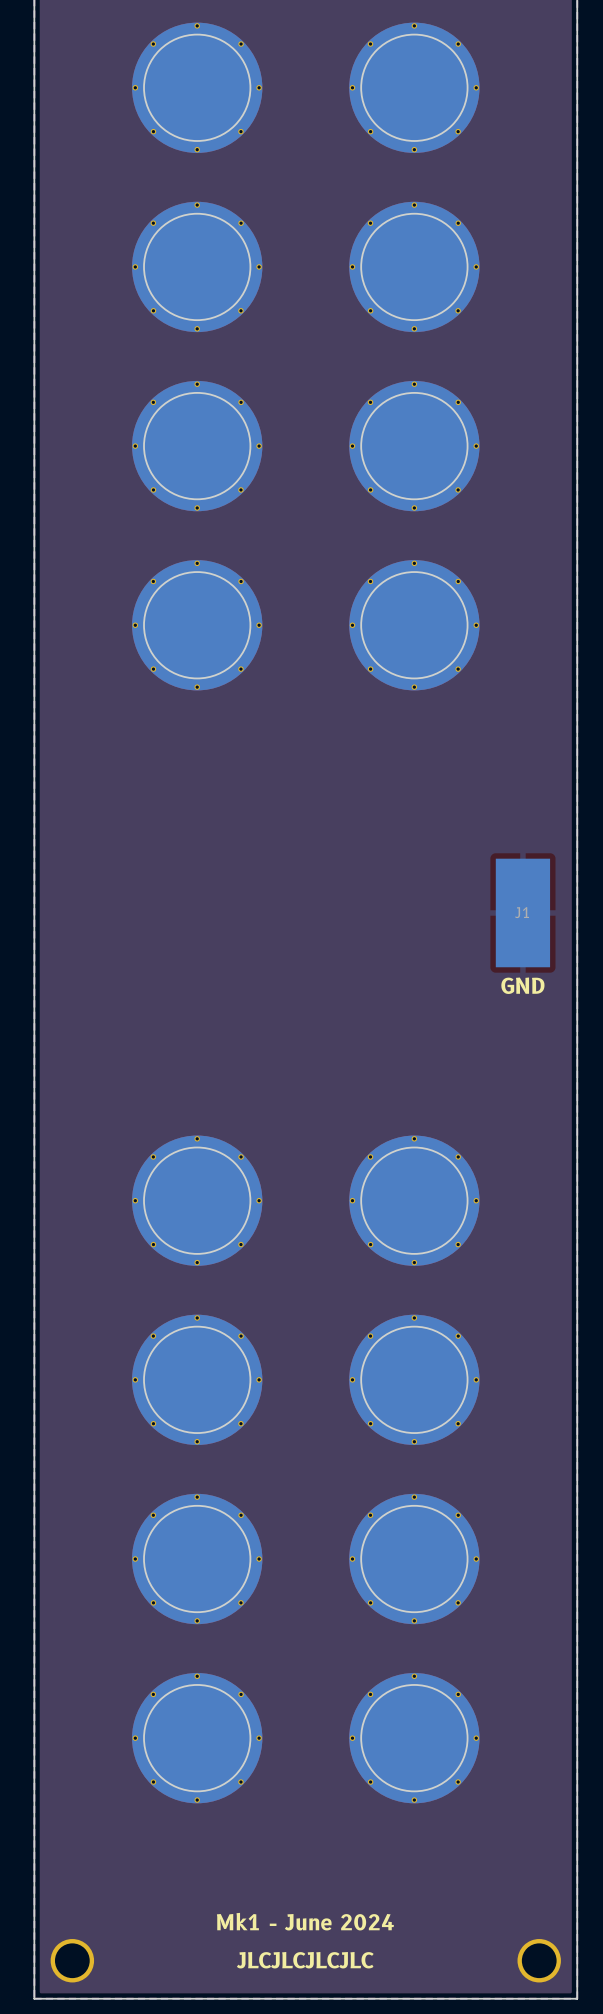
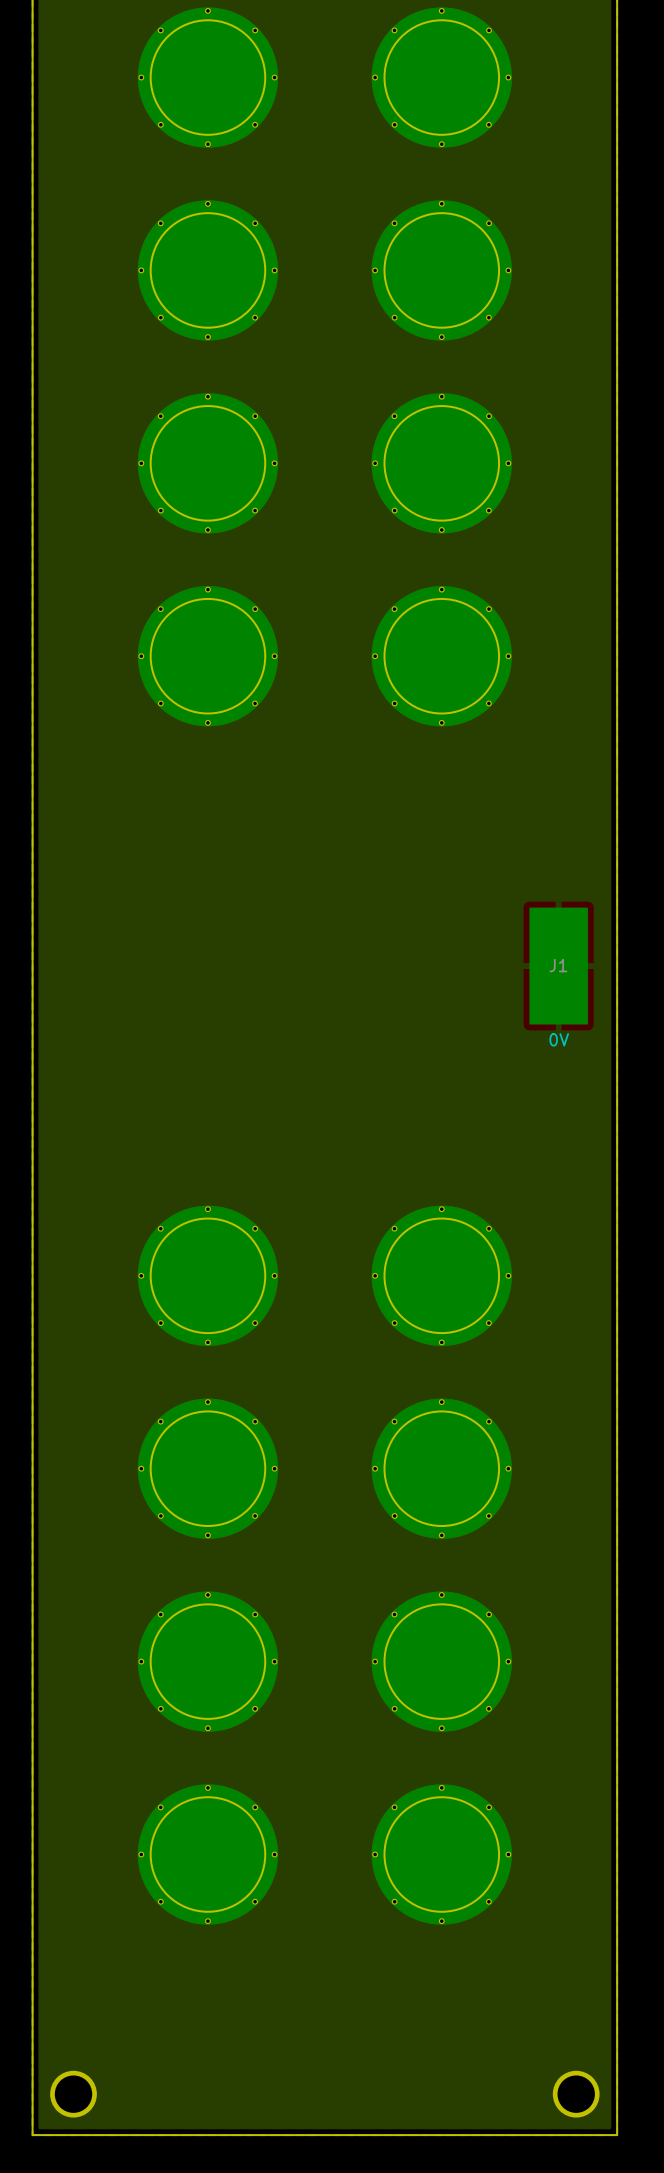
J1 value: GND (522, 985) -> 0V (559, 1039)
text: Mk1 - June 2024 (305, 1921) -> none
text: JLCJLCJLCJLC (305, 1960) -> none

